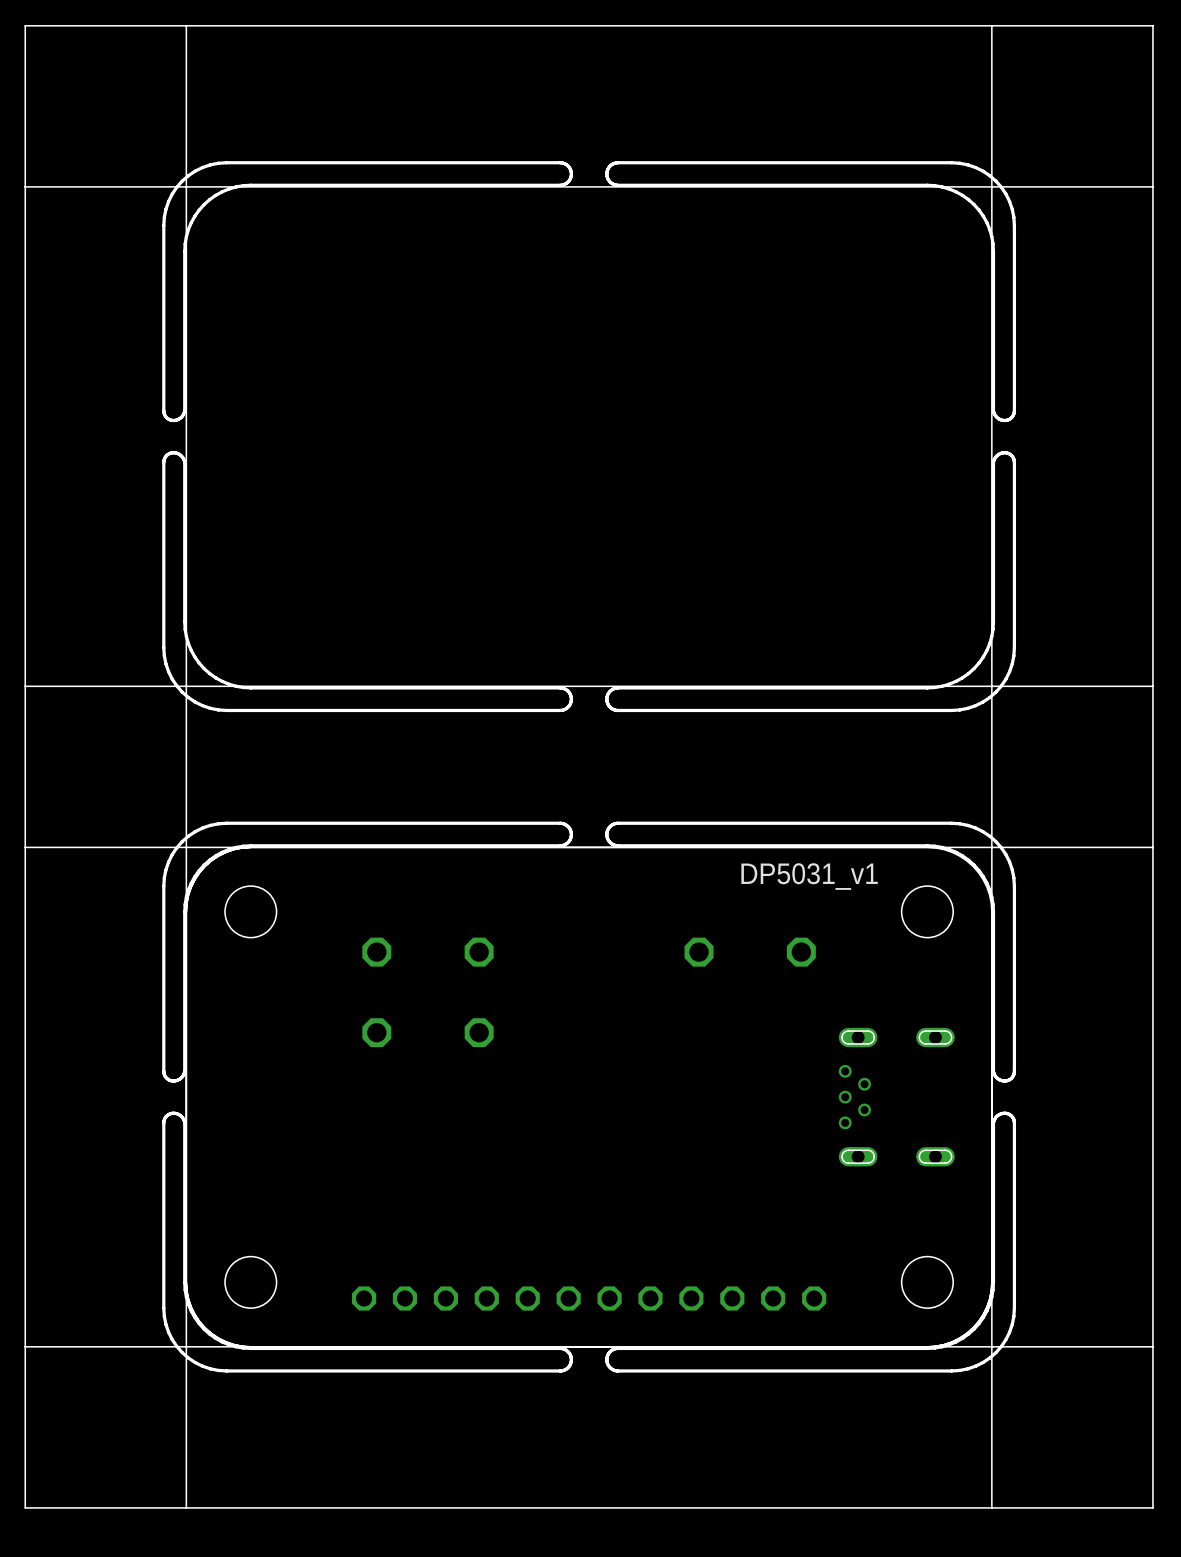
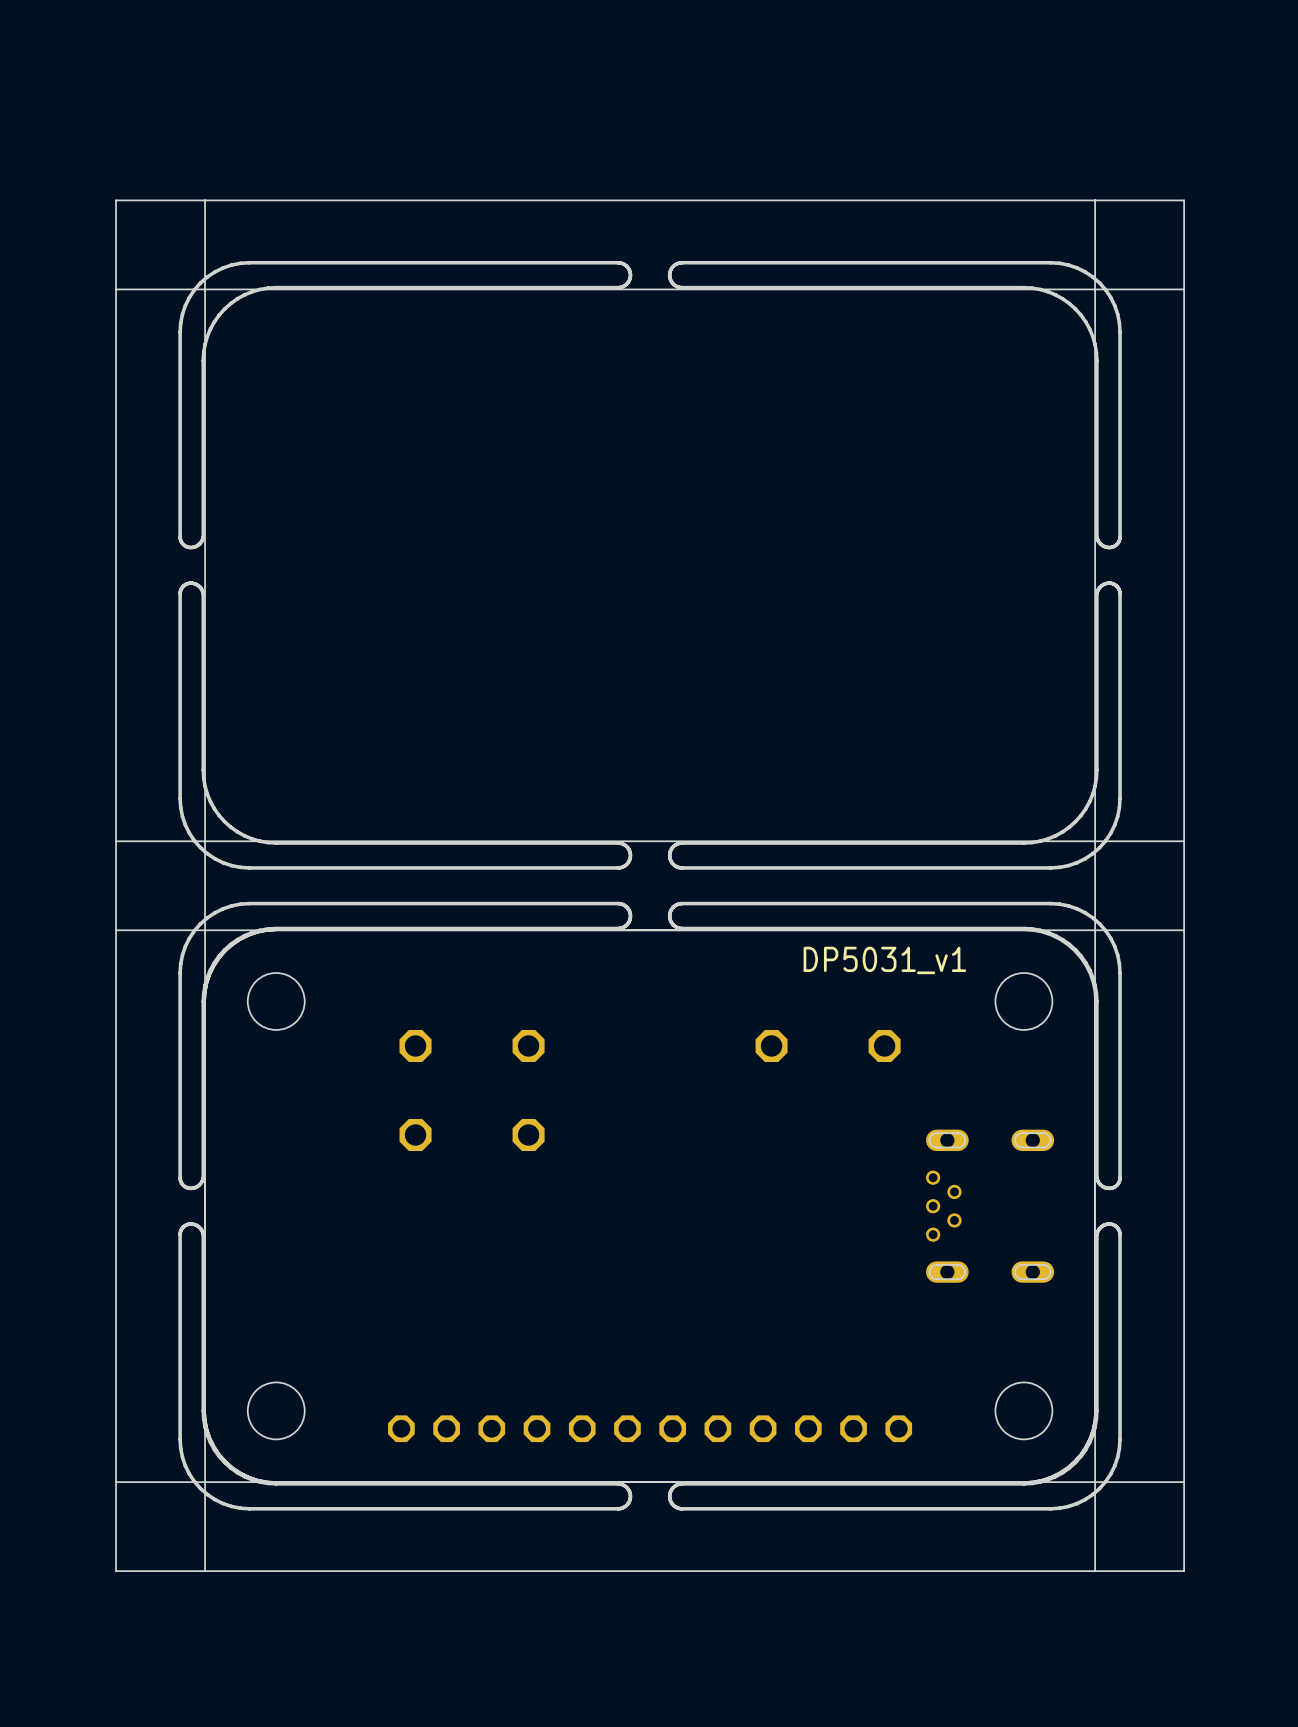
board edge: (186, 25) (186, 186) -> none
board edge: (991, 25) (991, 186) -> none
board edge: (1152, 25) (1152, 1507) (25, 1507) (25, 25) (1152, 25) -> none
board edge: (105, 186) (25, 186) -> none
board edge: (1152, 186) (1072, 186) -> (116, 200) (116, 1571) (1184, 1571) (1184, 200)
board edge: none -> (1184, 289) (116, 289)
board edge: (163, 306) (163, 225) (165, 209) (172, 194) (182, 181) (195, 171) (210, 164) (226, 162) (560, 162) (565, 164) (570, 169) (569, 179) (565, 183) (560, 185) (250, 185) (236, 186) (222, 191) (209, 199) (199, 210) (191, 222) (186, 236) (184, 331) -> (180, 332) (182, 314) (194, 289) (214, 272) (240, 263) (618, 262) (625, 265) (630, 271) (627, 282) (618, 287) (276, 287) (260, 289) (237, 298) (219, 315) (207, 336) (203, 360)
board edge: (1014, 306) (1014, 225) (1012, 209) (1005, 194) (996, 181) (982, 171) (967, 164) (951, 162) (618, 162) (612, 164) (607, 169) (608, 179) (612, 183) (618, 185) (927, 185) (942, 186) (956, 191) (968, 199) (979, 210) (986, 222) (991, 236) (993, 331) -> (1120, 332) (1117, 314) (1105, 289) (1085, 272) (1059, 263) (682, 262) (674, 265) (670, 271) (672, 282) (682, 287) (1023, 287) (1040, 289) (1062, 298) (1080, 315) (1092, 336) (1096, 360)
board edge: (184, 410) (180, 417) (173, 420) (166, 417) (163, 410) -> (203, 447) (203, 504)
board edge: (1014, 410) (1011, 417) (1004, 420) (997, 417) (993, 410) -> (1120, 447) (1120, 504)
board edge: (184, 462) (180, 455) (173, 452) (166, 455) (163, 462) -> (180, 447) (180, 504)
board edge: (1014, 462) (1011, 455) (1004, 452) (997, 455) (993, 462) -> (1096, 447) (1096, 504)
board edge: (163, 491) (163, 542) -> (203, 593) (199, 586) (190, 583) (183, 586) (180, 593)
board edge: (184, 491) (184, 542) -> (203, 536) (199, 544) (190, 547) (183, 544) (180, 536)
board edge: (993, 491) (993, 542) -> (1120, 593) (1116, 586) (1109, 583) (1101, 586) (1096, 593)
board edge: (1014, 491) (1014, 542) -> (1120, 536) (1116, 544) (1109, 547) (1101, 544) (1096, 536)
board edge: (184, 621) (188, 643) (199, 663) (215, 677) (236, 686) (250, 687) (560, 687) (569, 692) (570, 702) (566, 708) (560, 710) (218, 709) (195, 702) (176, 685) (165, 663) (163, 647) -> (203, 681) (203, 770) (205, 786) (210, 801) (219, 815) (230, 827) (244, 835) (260, 841) (276, 843) (618, 843) (624, 844) (628, 849) (629, 860) (624, 866) (618, 867) (249, 867) (231, 865) (214, 858) (200, 847) (189, 833) (182, 816) (180, 798) (180, 709)
board edge: (993, 621) (989, 643) (979, 663) (962, 677) (942, 686) (927, 687) (618, 687) (609, 692) (607, 702) (611, 708) (618, 710) (959, 709) (982, 702) (1001, 685) (1012, 663) (1014, 647) -> (1096, 681) (1096, 770) (1095, 786) (1089, 801) (1080, 815) (1069, 827) (1055, 835) (1040, 841) (1023, 843) (682, 843) (675, 844) (671, 849) (670, 860) (675, 866) (682, 867) (1050, 867) (1068, 865) (1085, 858) (1099, 847) (1110, 833) (1117, 816) (1120, 798) (1120, 709)
board edge: (1152, 686) (25, 686) -> none
board edge: none -> (1184, 841) (116, 841)
board edge: (105, 847) (25, 847) -> none
board edge: (1152, 847) (1072, 847) -> none
board edge: (105, 1346) (25, 1346) -> none
board edge: (1152, 1346) (1072, 1346) -> none
board edge: (186, 1427) (186, 1507) -> none
board edge: (991, 1427) (991, 1507) -> none

